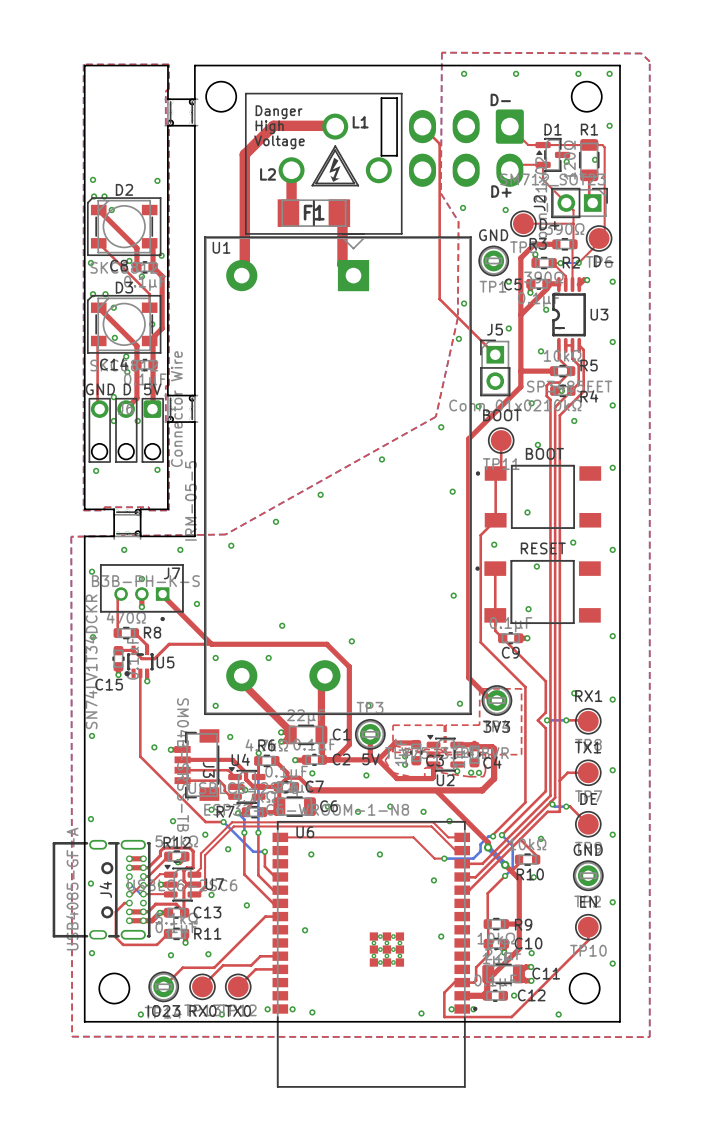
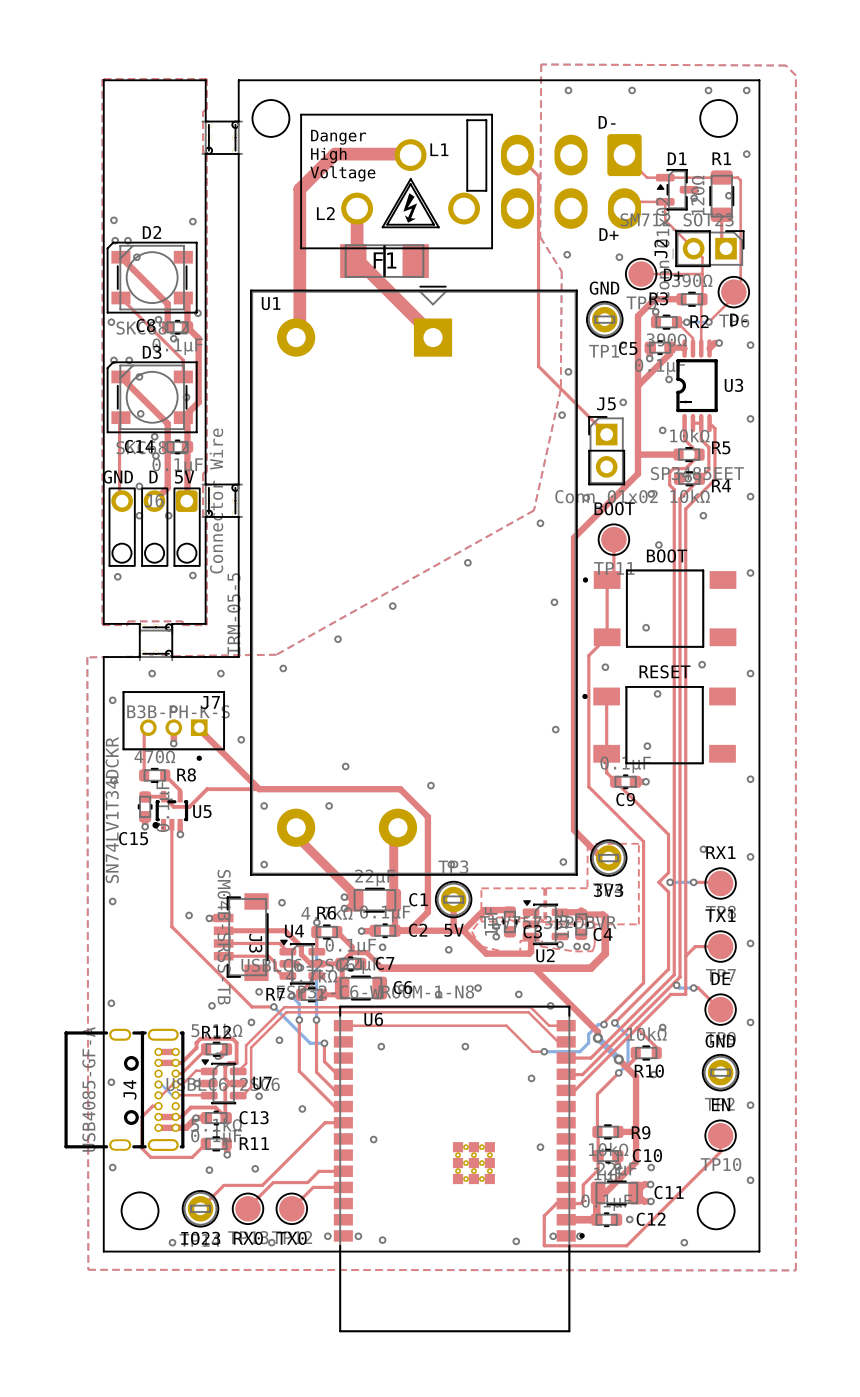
line: (245, 202) (245, 233) (401, 233) (401, 202) -> (301, 248) (492, 248)
top track: (340, 217) (342, 216) (342, 264) (353, 275) -> (357, 257) (357, 259) (433, 335) (433, 337)

